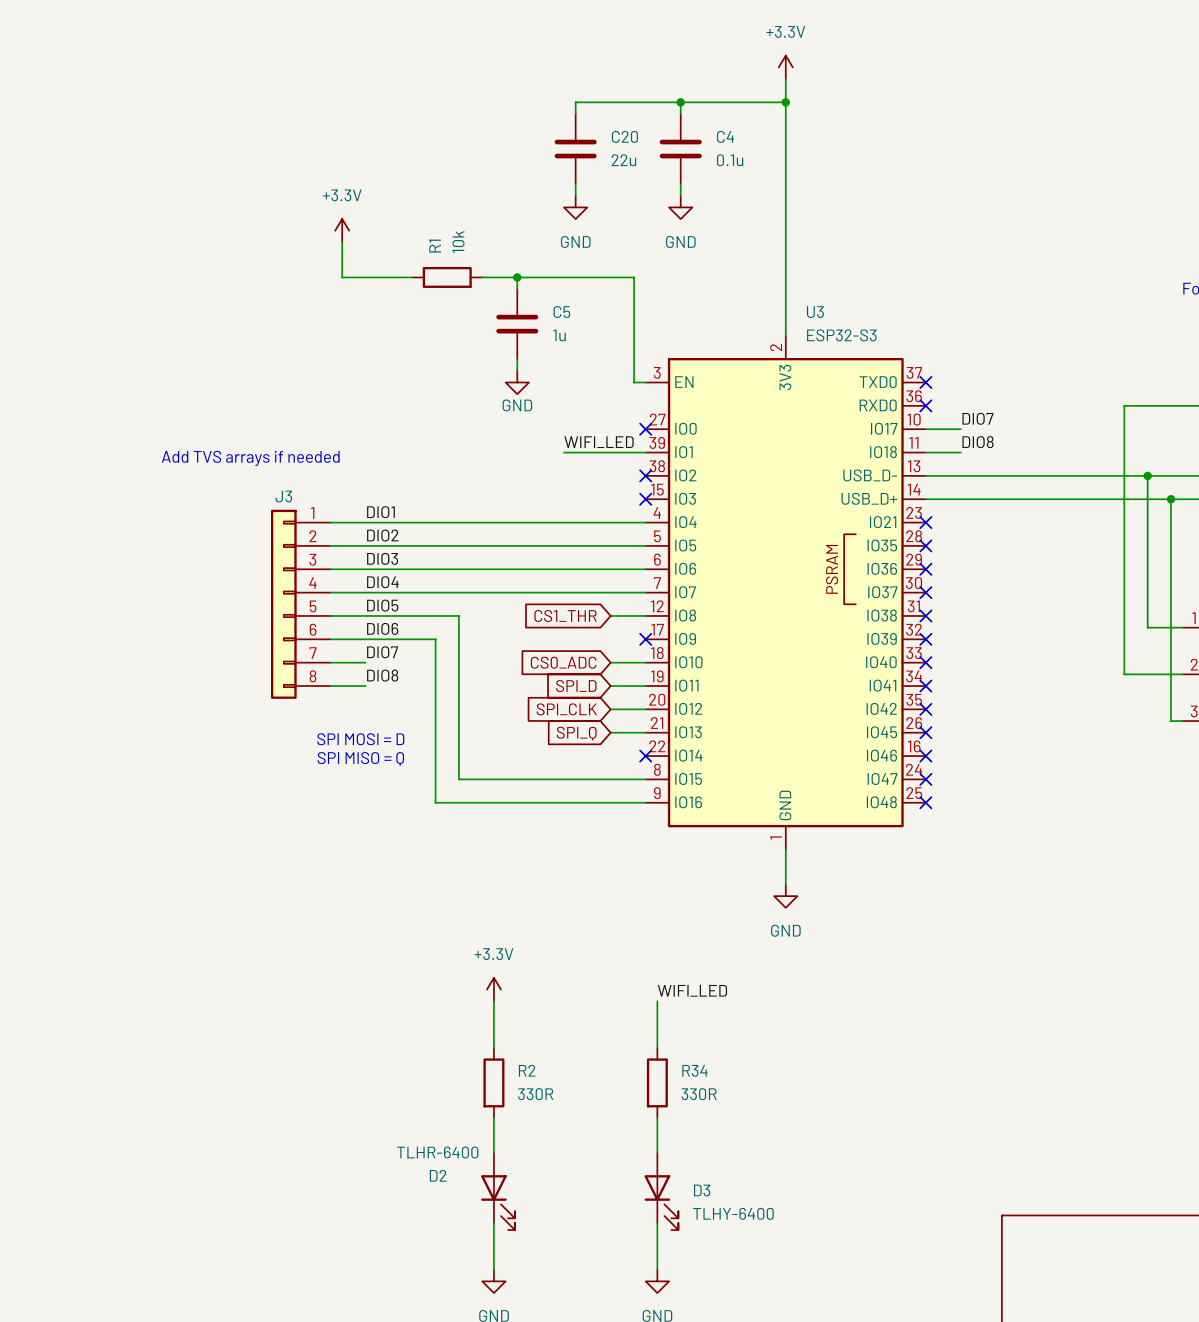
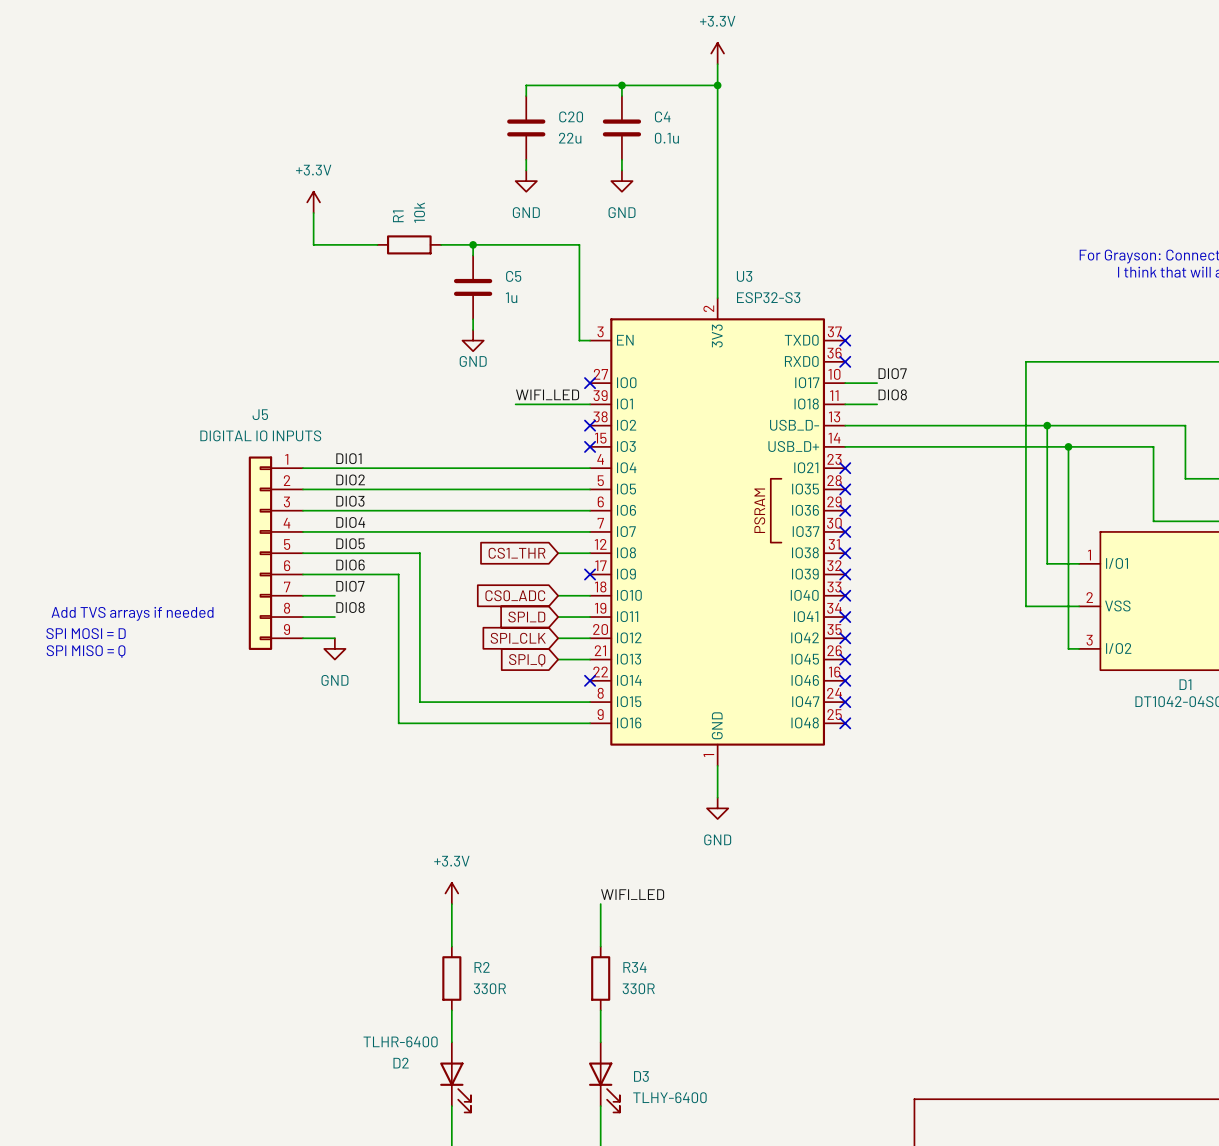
text: Add TVS arrays if needed (250, 458) -> none
J3: (300, 604) -> none
J5: none -> DIGITAL IO INPUTS (275, 553)
text: none -> Add TVS arrays if needed (132, 613)
text: none -> SPI MOSI = D (86, 633)
wire: none -> (302, 638) (334, 638)
power symbol: none -> GND (334, 648)
text: none -> SPI MISO = Q (86, 651)
text: SPI MOSI = D (360, 739) -> none
text: SPI MISO = Q (360, 758) -> none

